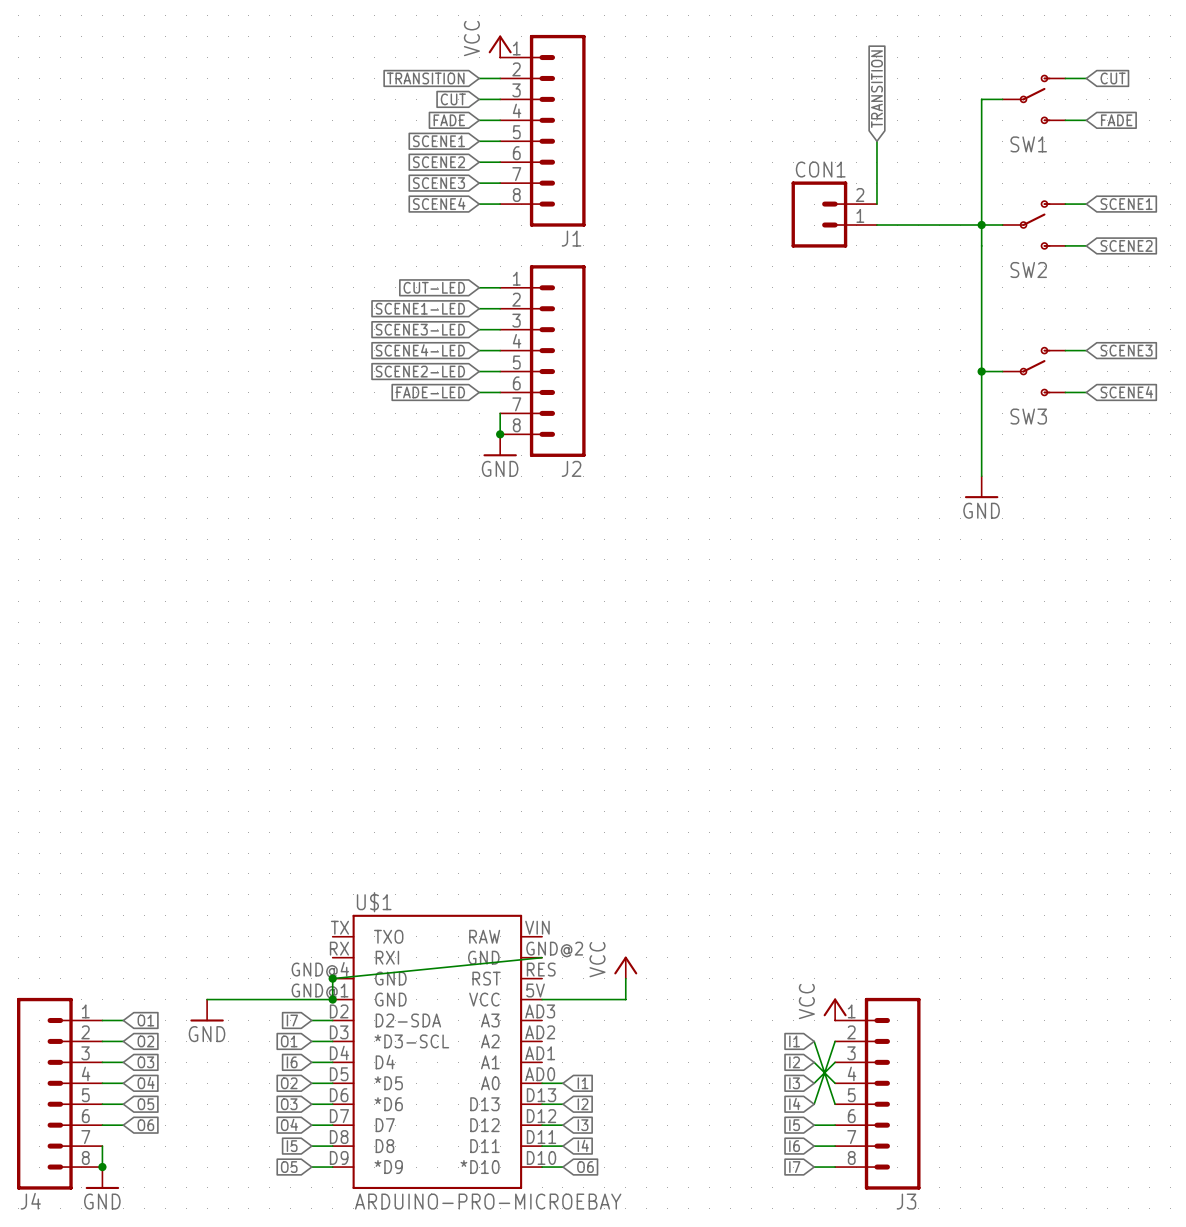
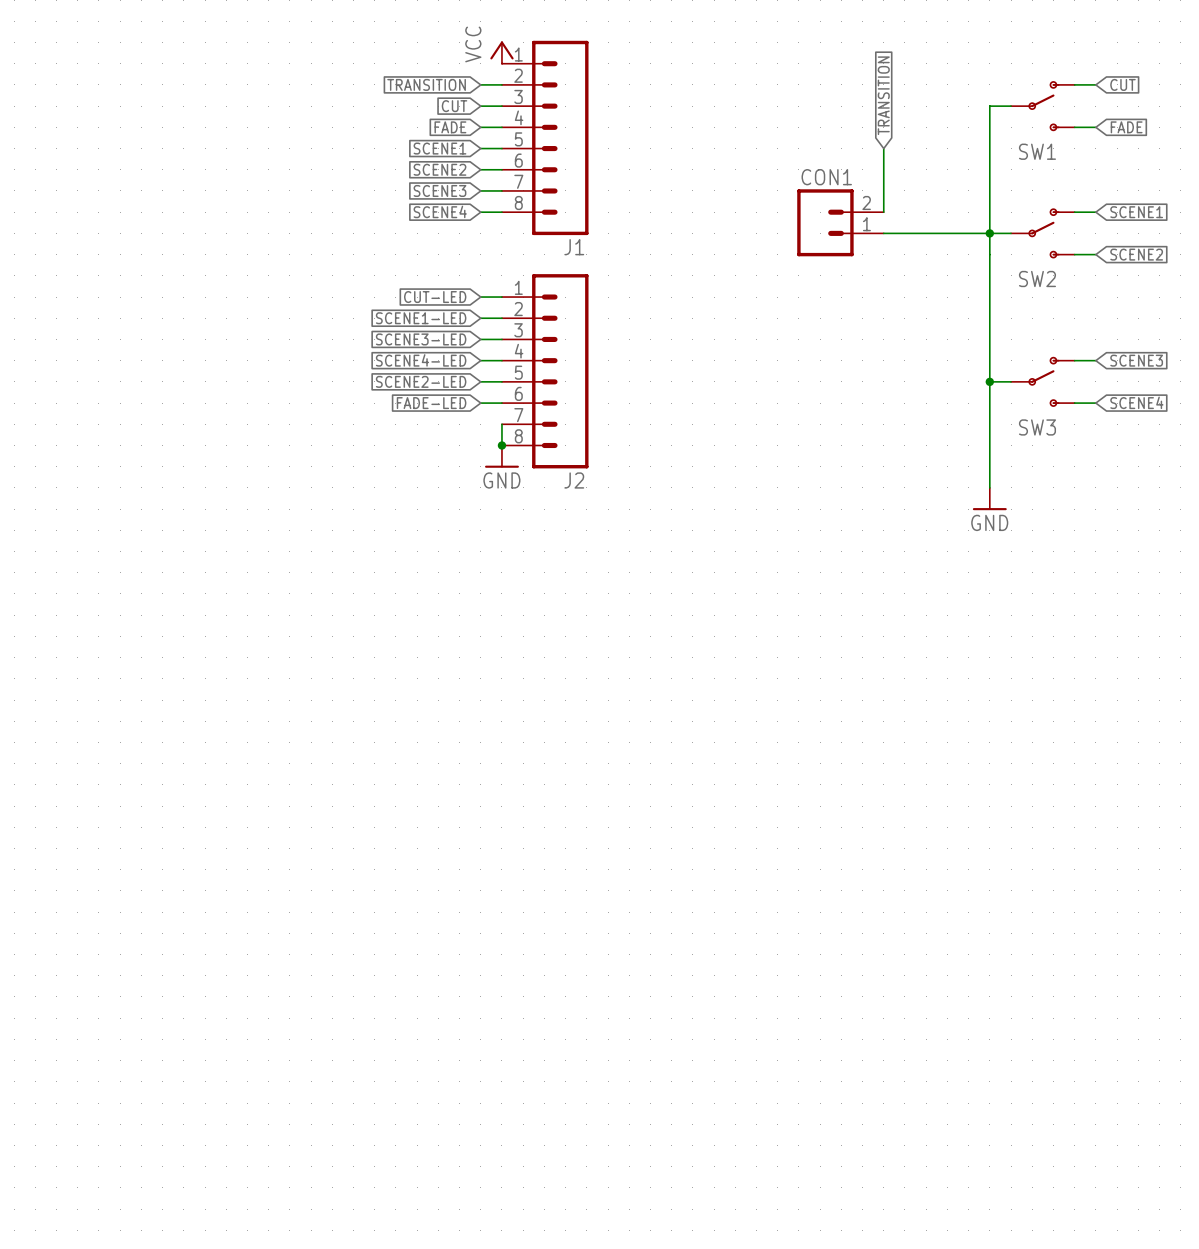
wire: (542, 957) (332, 978) (332, 999) (207, 999) -> none
power symbol: VCC (625, 967) -> none
junction: (332, 978) -> none
wire: (625, 978) (625, 999) (542, 999) -> none
junction: (332, 999) -> none
power symbol: VCC (835, 1009) -> none
power symbol: GND (207, 1010) -> none
wire: (102, 1020) (123, 1020) -> none
global label: O1 (145, 1020) -> none
global label: I7 (292, 1020) -> none
wire: (311, 1020) (332, 1020) -> none
wire: (102, 1041) (123, 1041) -> none
global label: O2 (145, 1041) -> none
global label: O1 (289, 1041) -> none
wire: (311, 1041) (332, 1041) -> none
global label: I1 (794, 1041) -> none
wire: (814, 1041) (835, 1104) -> none
wire: (835, 1041) (814, 1104) -> none
U$1: ARDUINO-PRO-MICROEBAY (437, 1051) -> none
wire: (102, 1062) (123, 1062) -> none
global label: O3 (145, 1062) -> none
global label: I6 (292, 1062) -> none
wire: (311, 1062) (332, 1062) -> none
global label: I2 (794, 1062) -> none
wire: (814, 1062) (835, 1083) -> none
wire: (835, 1062) (814, 1083) -> none
wire: (102, 1083) (123, 1083) -> none
global label: O4 (146, 1083) -> none
global label: O2 (289, 1083) -> none
wire: (311, 1083) (332, 1083) -> none
wire: (542, 1083) (562, 1083) -> none
global label: I1 (583, 1083) -> none
global label: I3 (794, 1083) -> none
J4: (59, 1093) -> none
J3: (877, 1093) -> none
global label: I4 (794, 1103) -> none
wire: (102, 1104) (123, 1104) -> none
global label: O5 (145, 1104) -> none
global label: O3 (289, 1104) -> none
wire: (311, 1104) (332, 1104) -> none
wire: (542, 1104) (562, 1104) -> none
global label: I2 (583, 1104) -> none
global label: O4 (289, 1124) -> none
wire: (102, 1125) (123, 1125) -> none
global label: O6 (145, 1125) -> none
wire: (311, 1125) (332, 1125) -> none
wire: (542, 1125) (562, 1125) -> none
global label: I3 (583, 1125) -> none
global label: I5 (794, 1125) -> none
wire: (814, 1125) (835, 1125) -> none
global label: I4 (583, 1145) -> none
wire: (102, 1146) (102, 1167) -> none
global label: I5 (292, 1146) -> none
wire: (311, 1146) (332, 1146) -> none
wire: (542, 1146) (562, 1146) -> none
global label: I6 (794, 1146) -> none
wire: (814, 1146) (835, 1146) -> none
junction: (102, 1167) -> none
global label: O5 (289, 1167) -> none
wire: (311, 1167) (332, 1167) -> none
wire: (542, 1167) (562, 1167) -> none
global label: O6 (585, 1167) -> none
global label: I7 (794, 1167) -> none
wire: (814, 1167) (835, 1167) -> none
power symbol: GND (102, 1178) -> none

